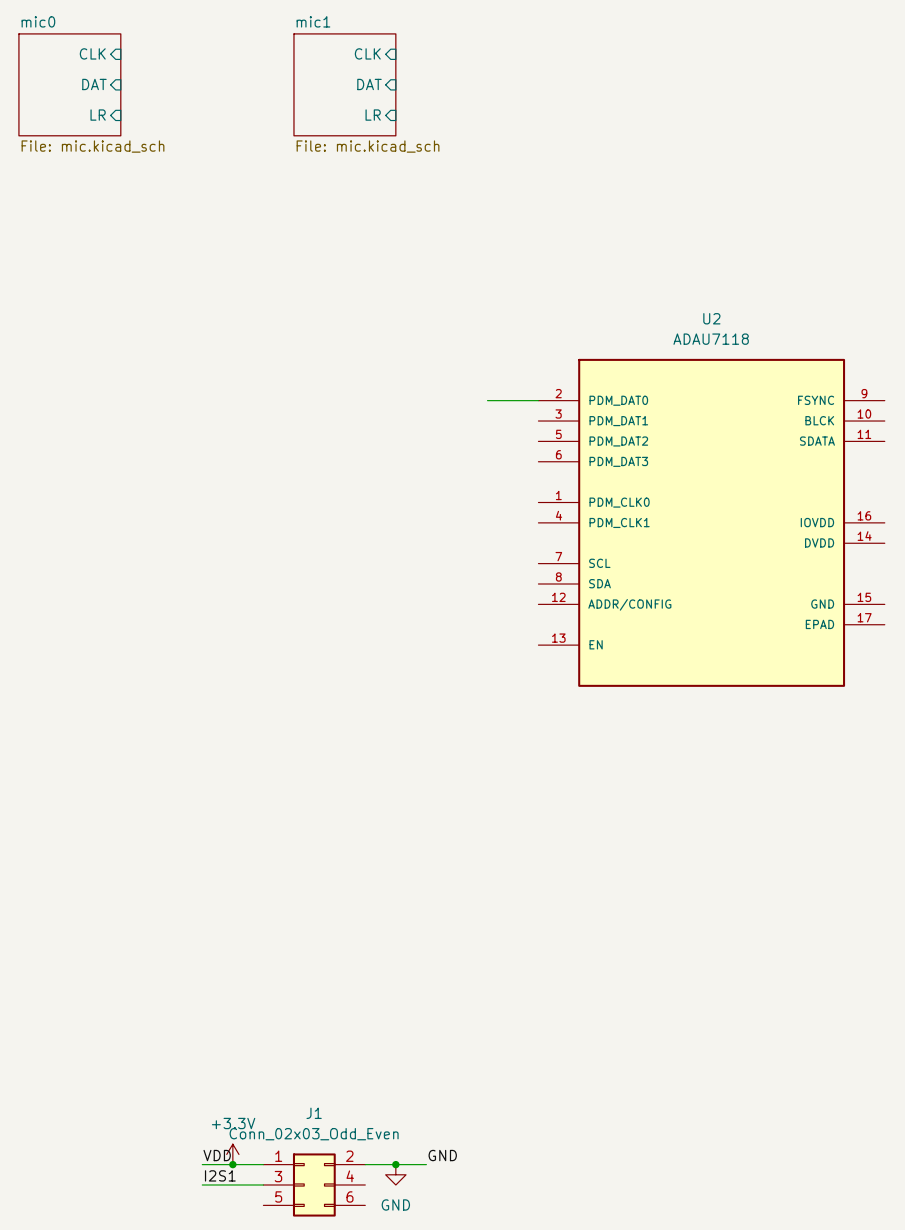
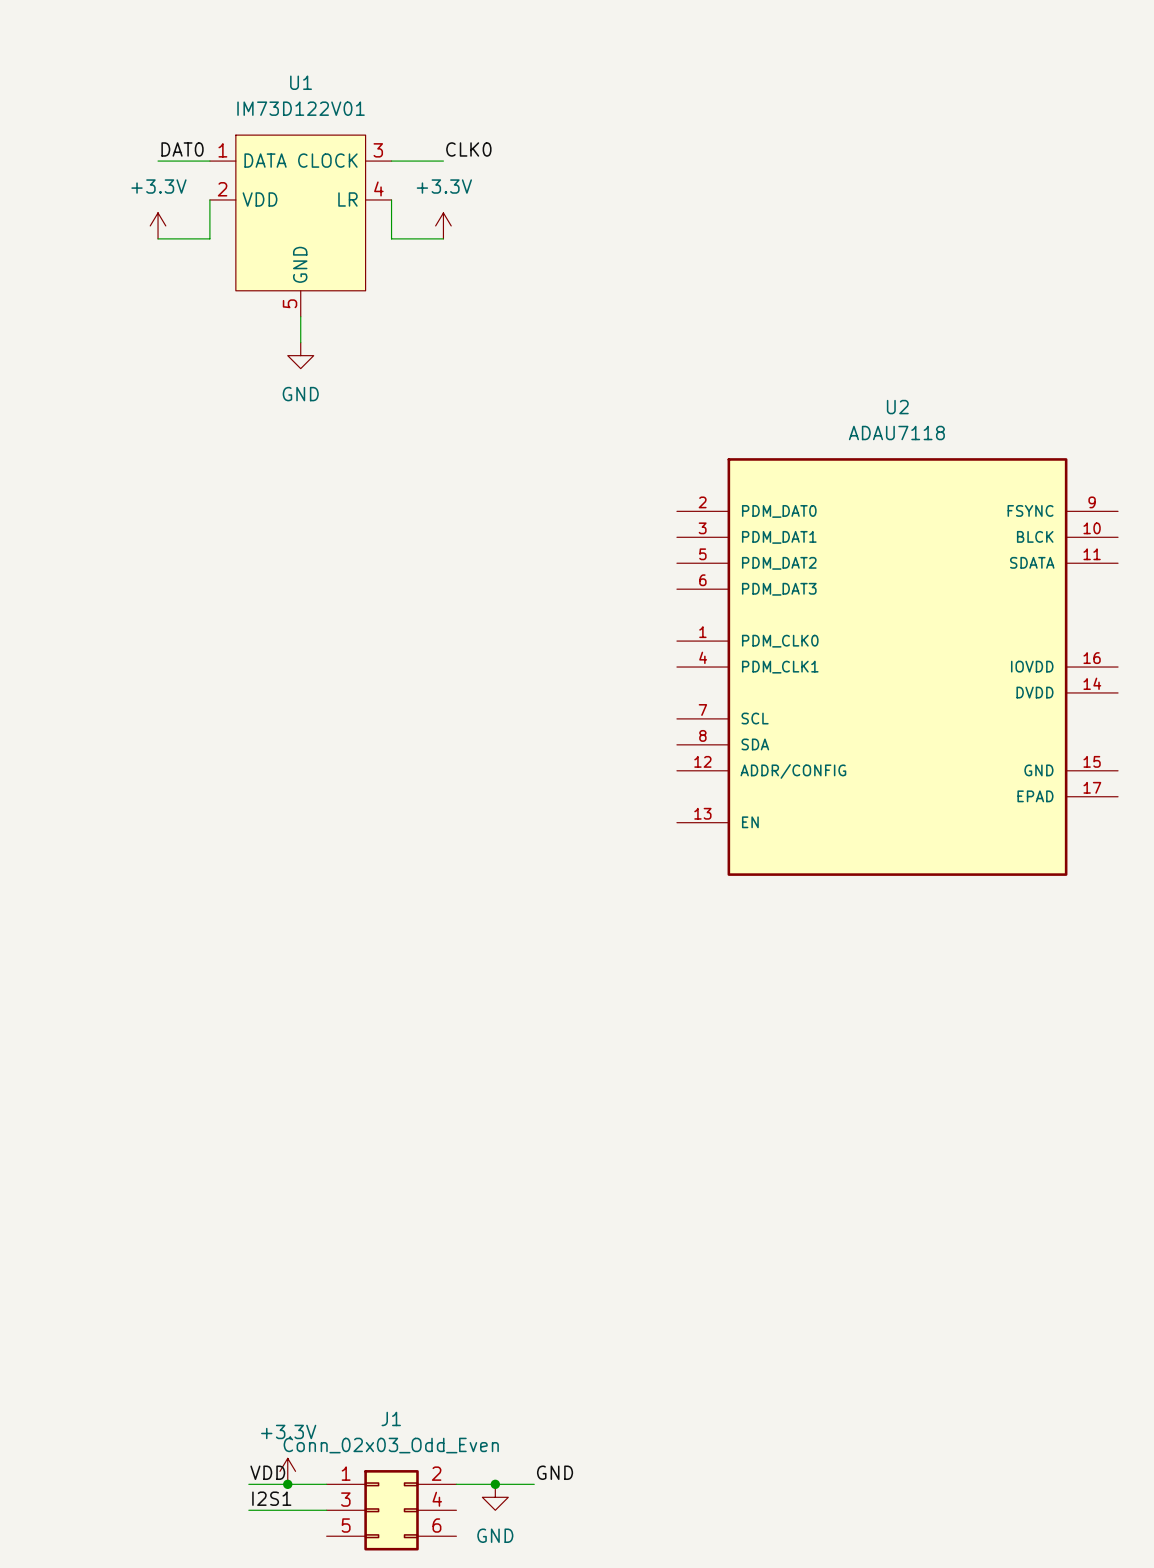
sheet pin: CLK (92, 53) -> none
sheet pin: CLK (367, 53) -> none
sheet mic0: File: mic.kicad_sch (69, 84) -> none
sheet pin: DAT (94, 84) -> none
sheet mic1: File: mic.kicad_sch (344, 84) -> none
sheet pin: DAT (369, 84) -> none
sheet pin: LR (98, 115) -> none
sheet pin: LR (373, 115) -> none
label: none -> DAT0 (182, 149)
label: none -> CLK0 (468, 149)
wire: none -> (158, 161) (209, 161)
wire: none -> (391, 161) (443, 161)
wire: none -> (209, 199) (209, 238) (158, 238)
wire: none -> (391, 199) (391, 238) (443, 238)
power symbol: none -> +3.3V (158, 225)
U1: none -> IM73D122V01 (300, 225)
power symbol: none -> +3.3V (443, 225)
wire: none -> (300, 316) (300, 342)
power symbol: none -> GND (300, 355)
wire: (487, 400) (538, 400) -> none

